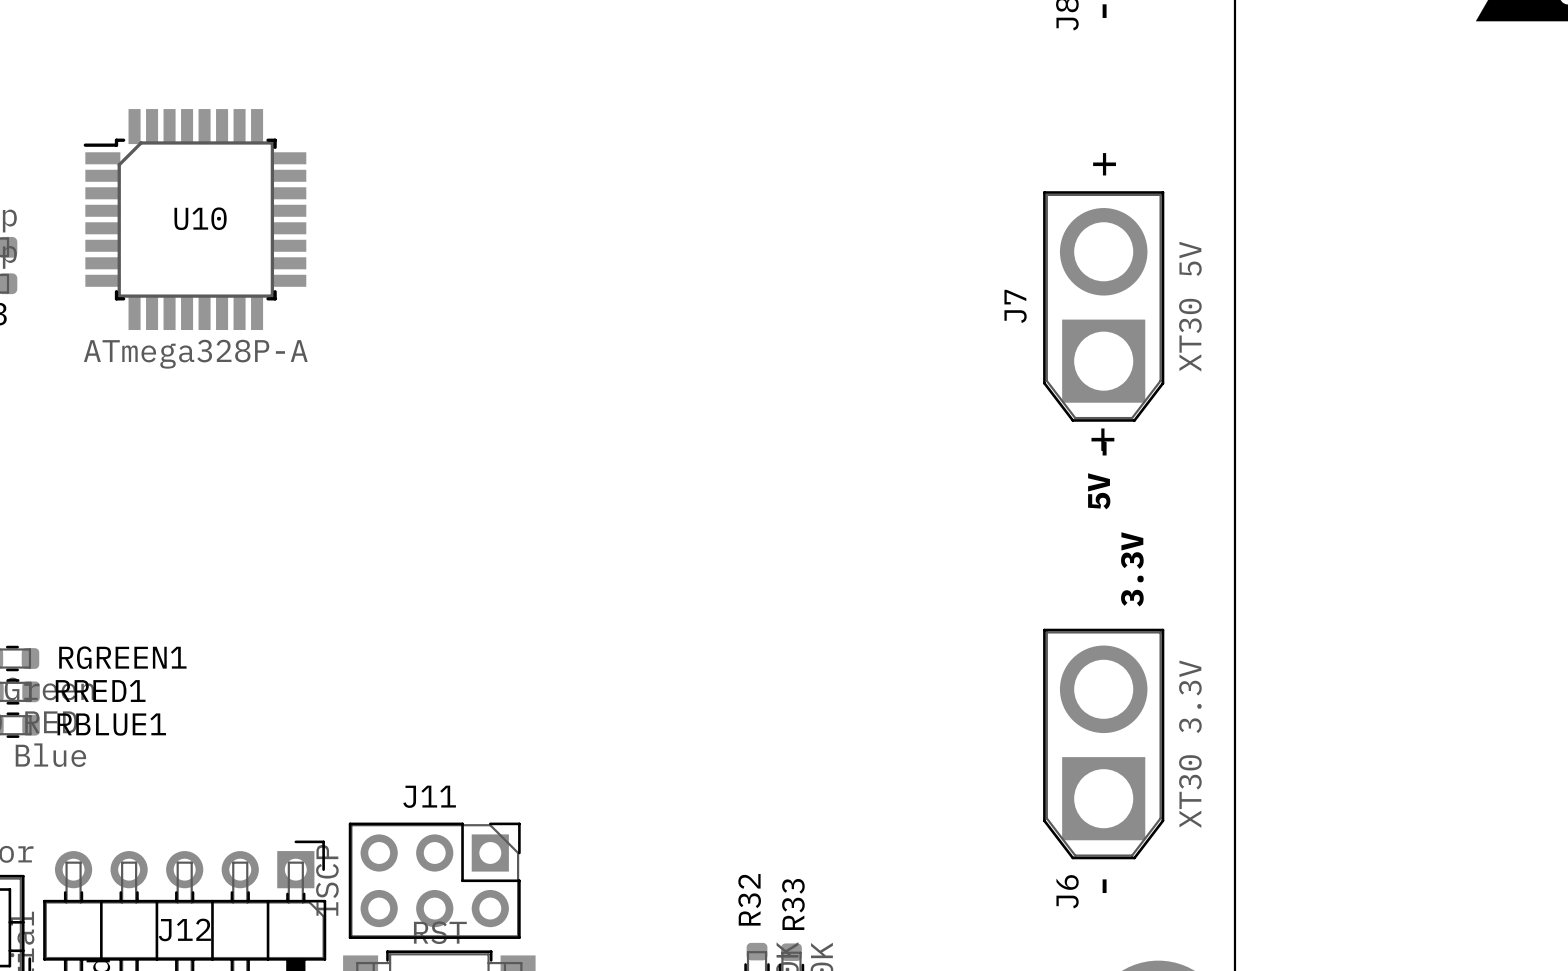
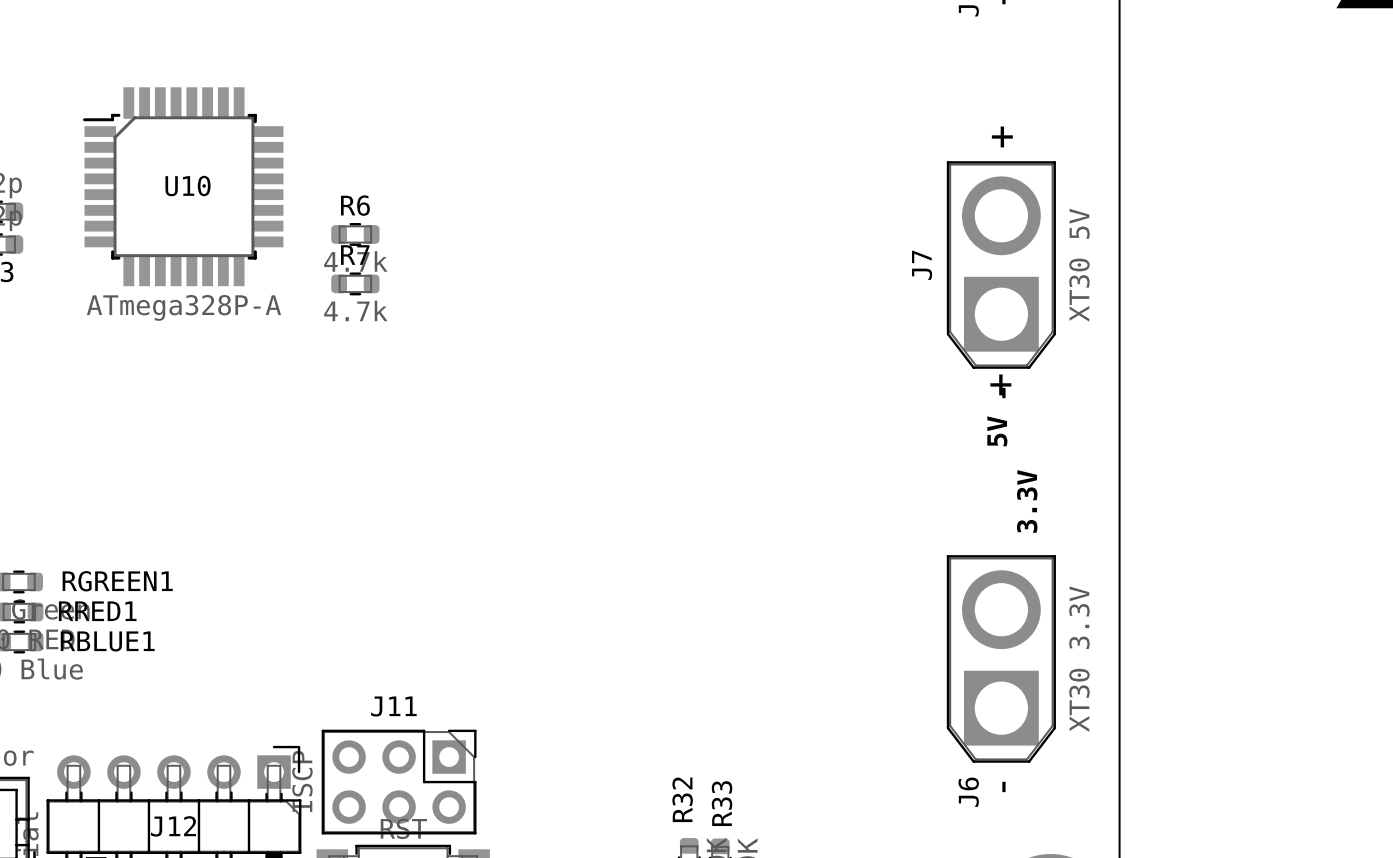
R6: none -> 4.7k (355, 234)
R7: none -> 4.7k (355, 283)

